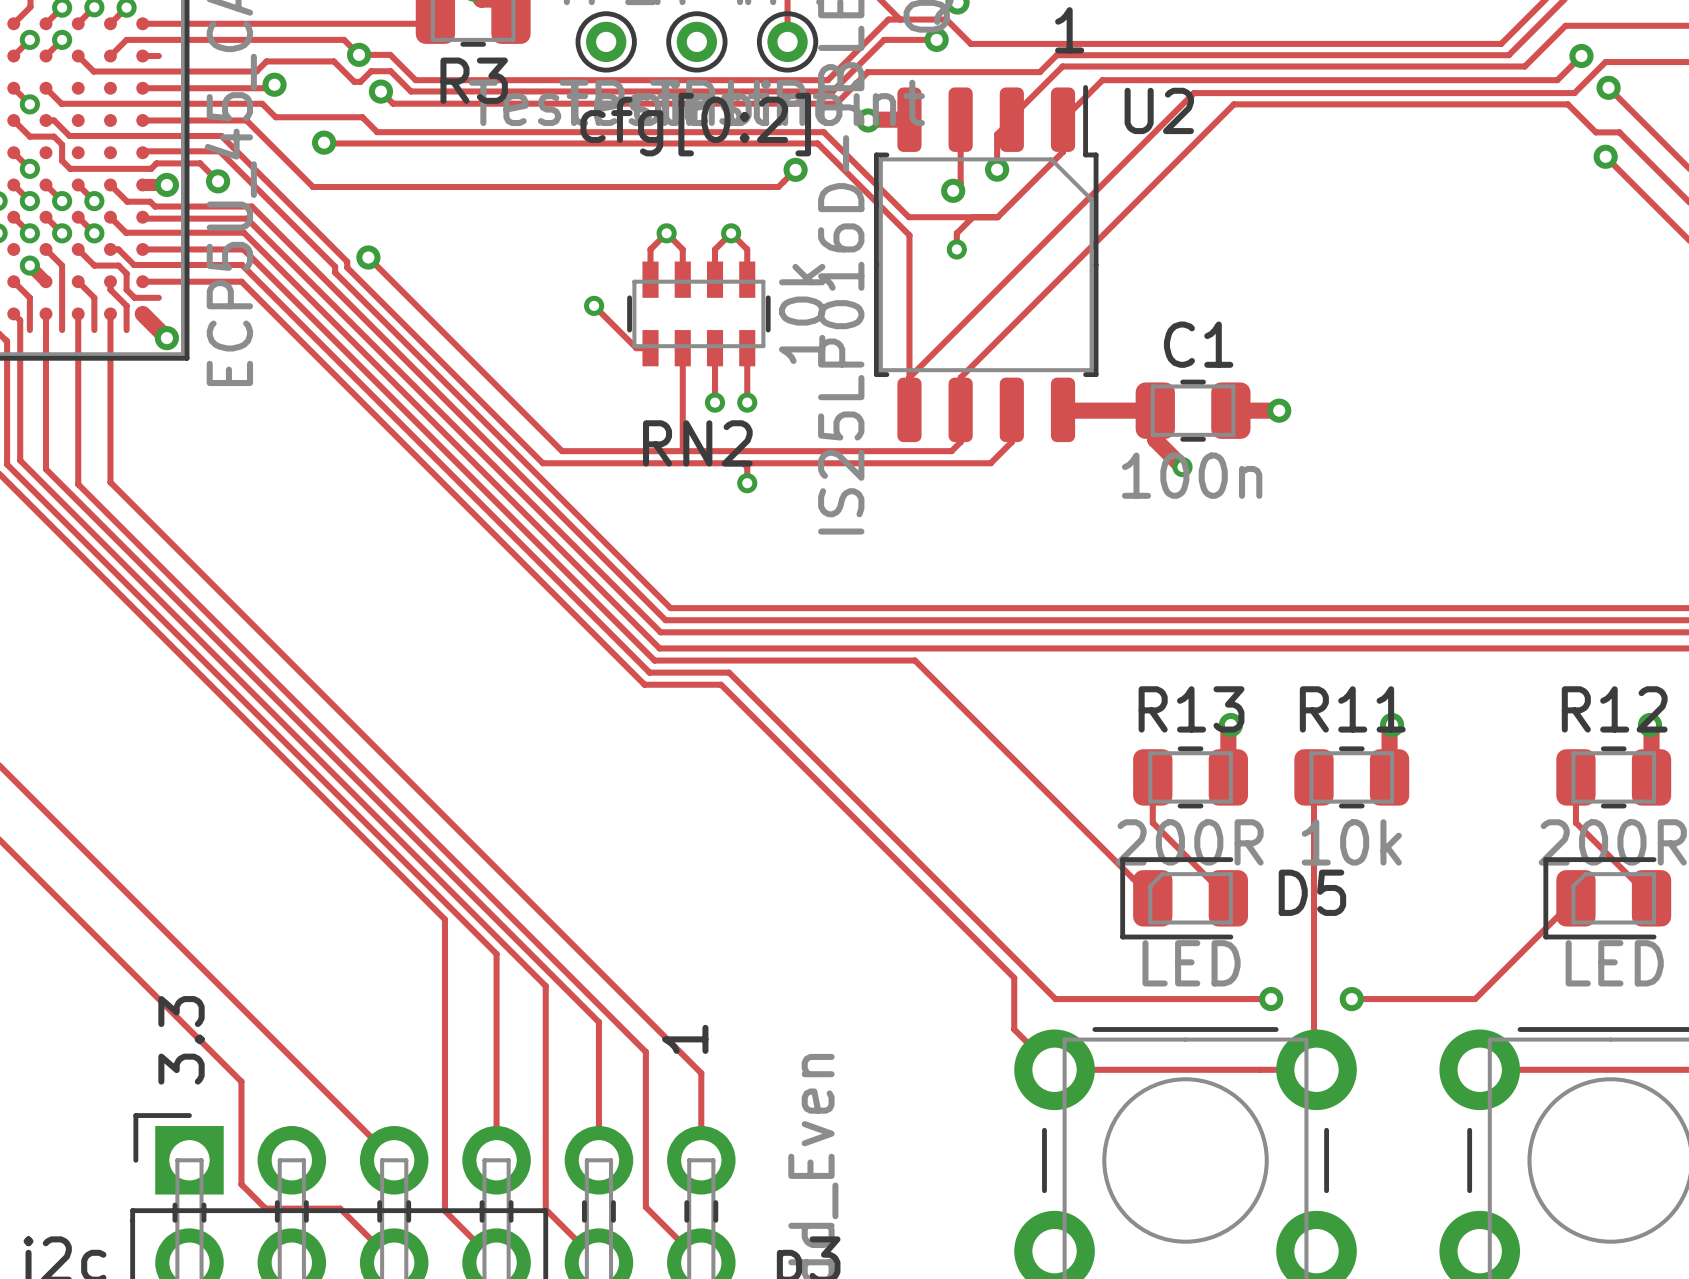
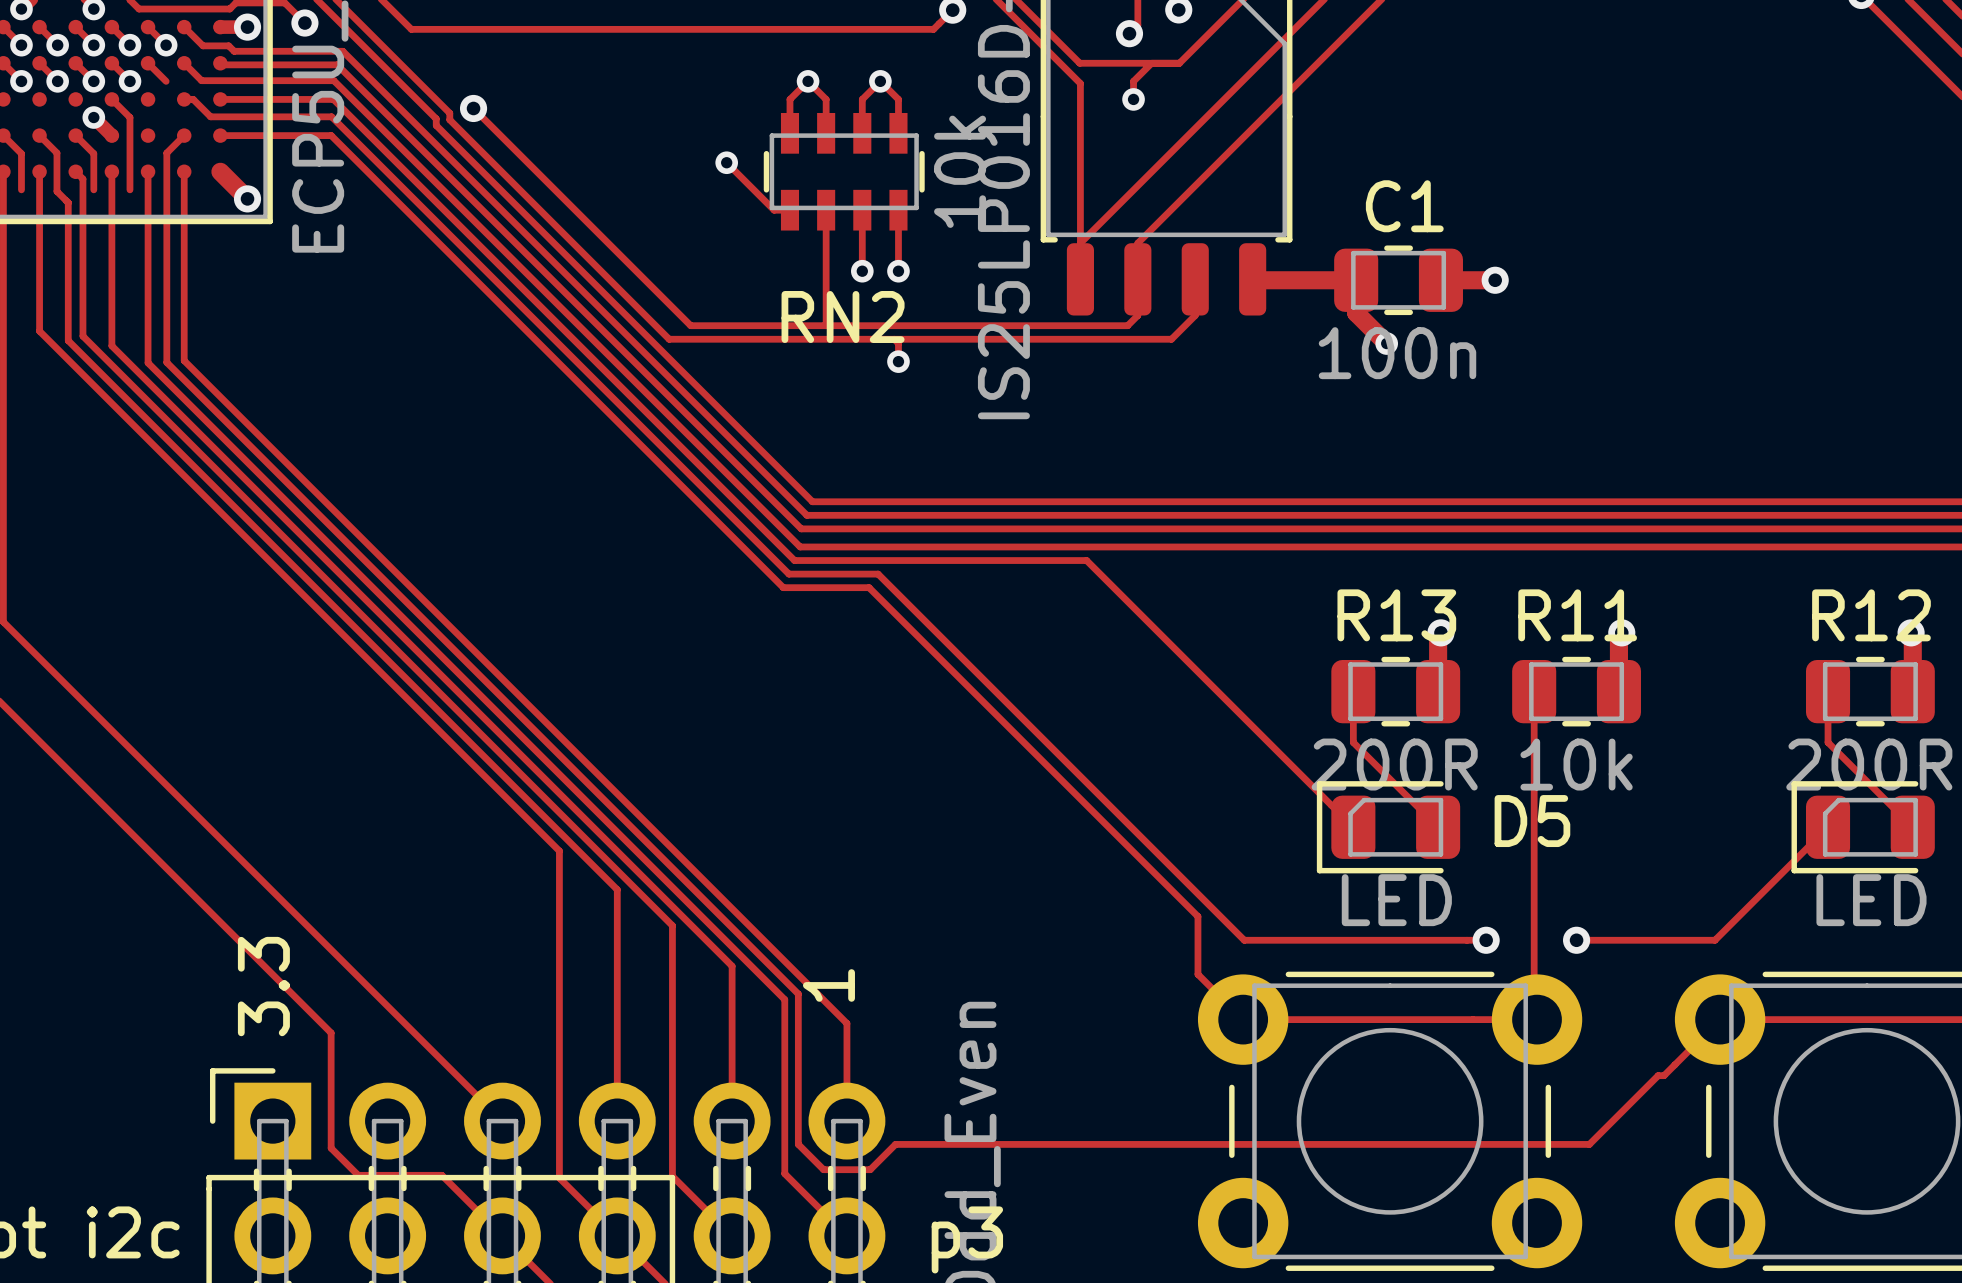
via: (94, 233) -> none
track: (78, 249) (94, 265) (118, 265) (126, 273) (126, 289) (134, 297) (158, 297) -> none
track: (78, 281) (94, 297) (94, 330) -> none
track: (110, 281) (110, 289) (126, 305) (126, 330) -> (184, 135) (166, 153) (166, 362) (798, 994) (798, 1144) (823, 1169) (870, 1169) (895, 1144) (1589, 1144) (1658, 1075) (1664, 1075) (1720, 1019)

